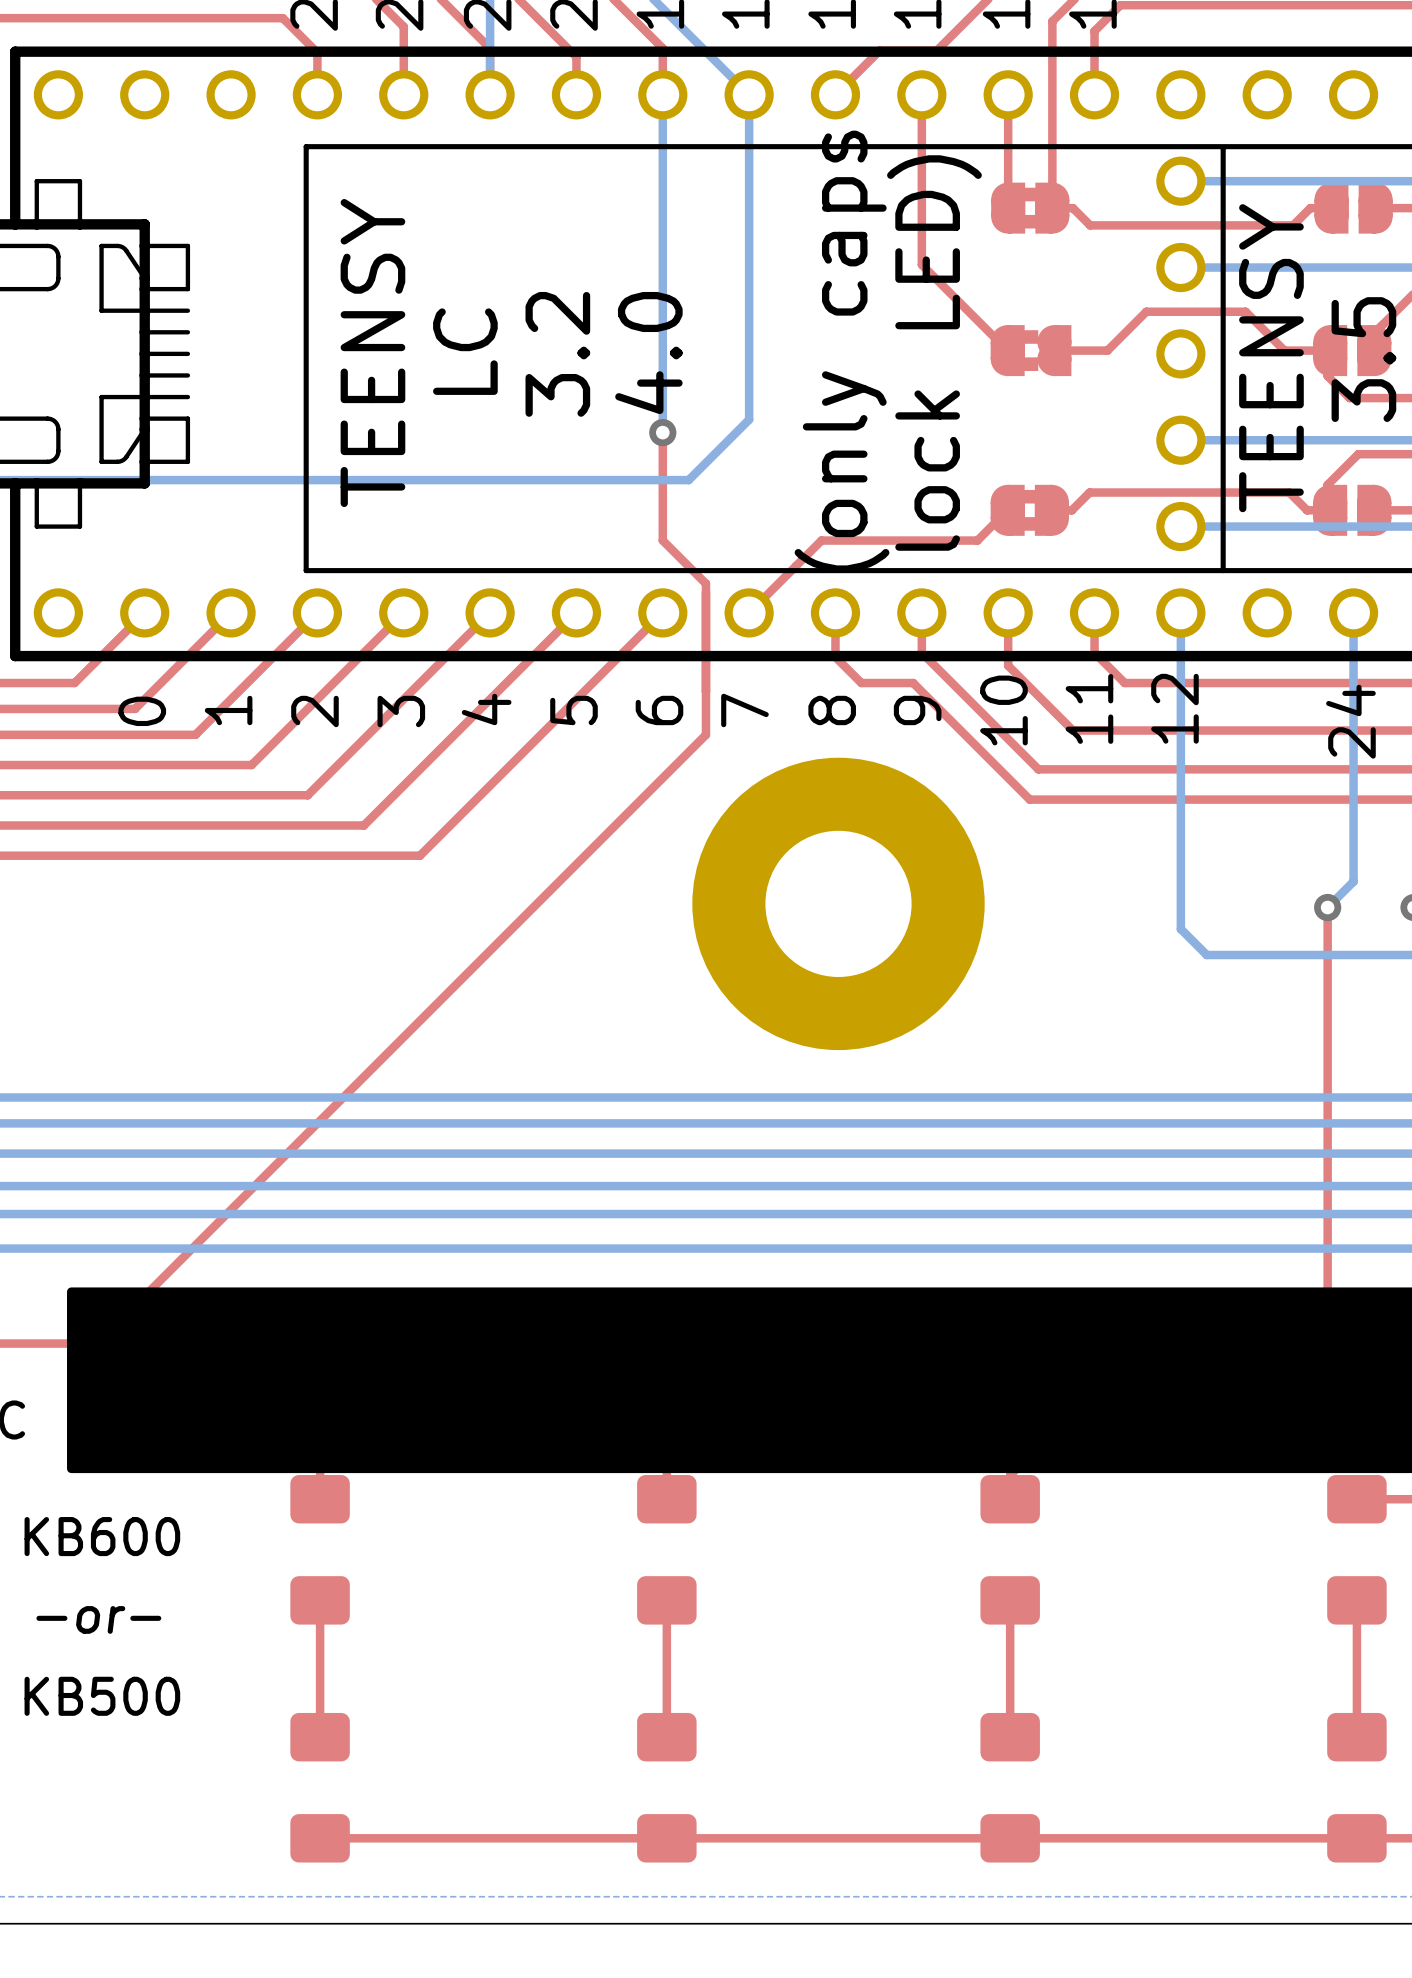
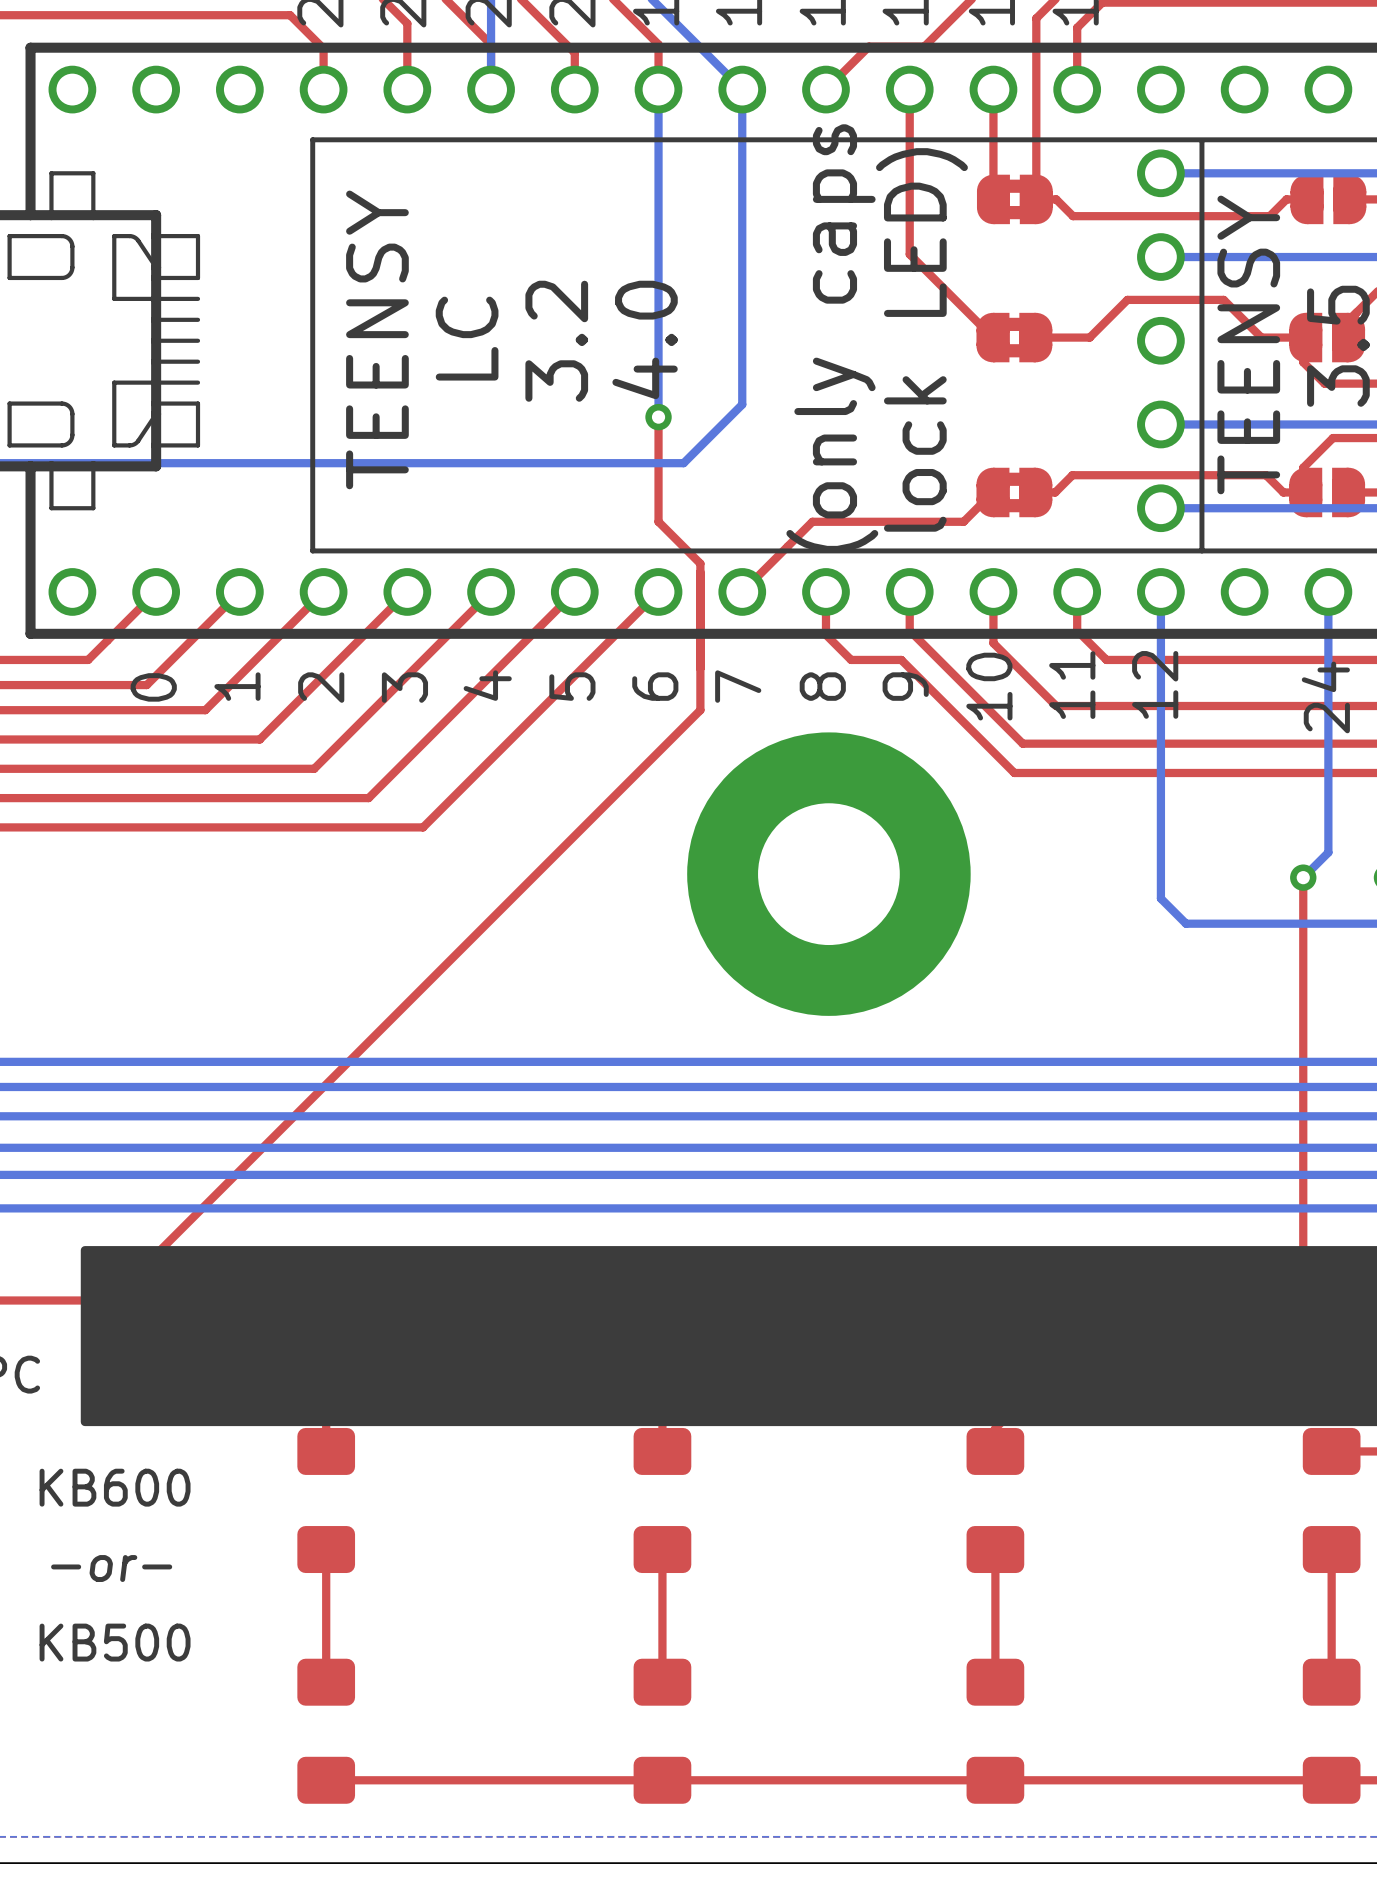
part footprint: [990, 325, 1072, 377] -> [976, 312, 1053, 363]

